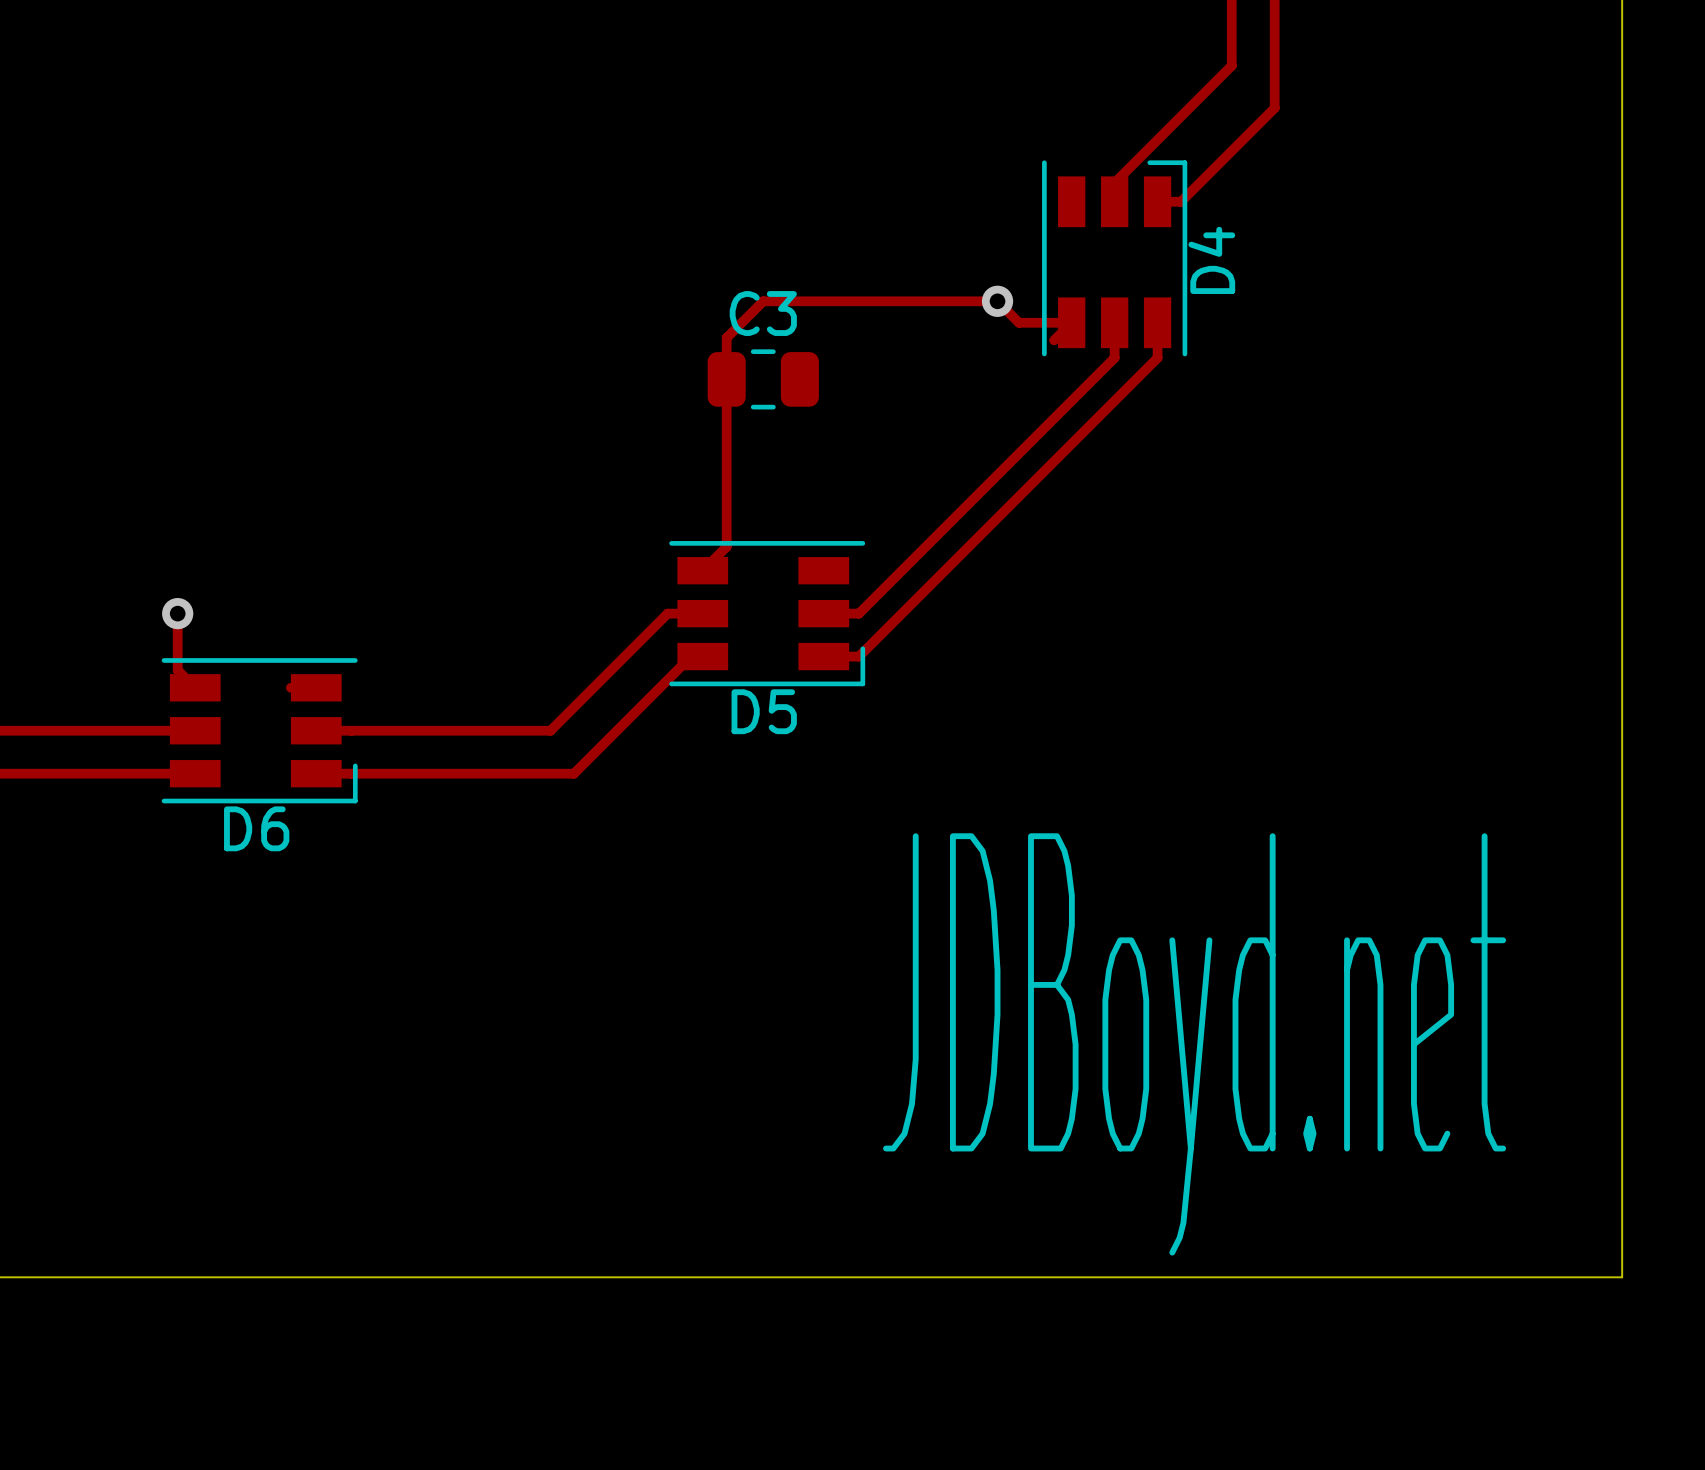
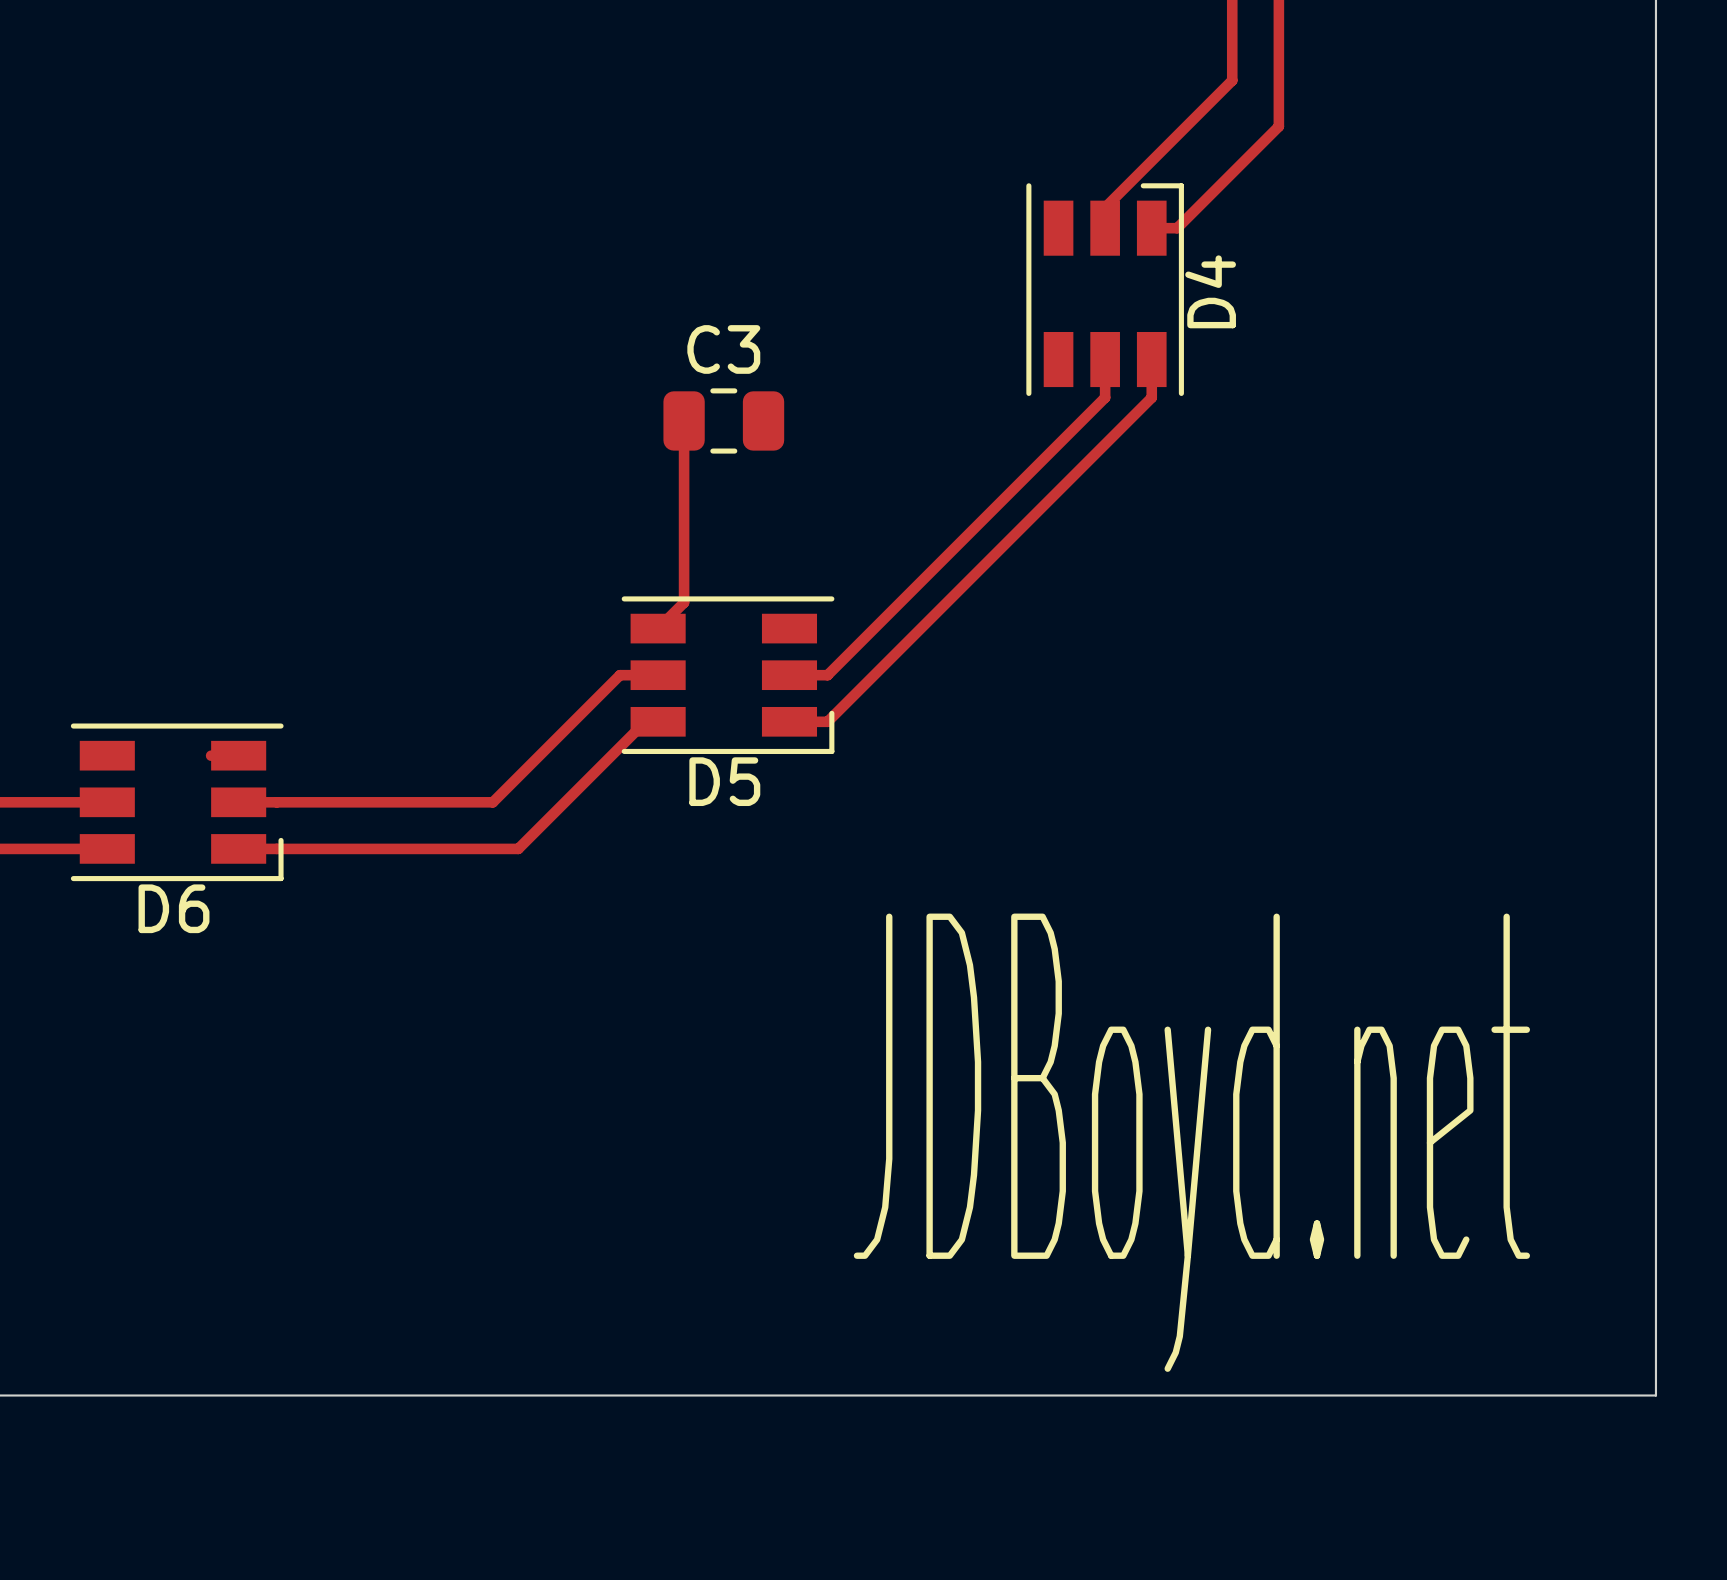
via: (997, 301) -> none
track: (1054, 340) (1071, 322) (1018, 322) (997, 301) (763, 301) (726, 337) (726, 379) -> none
track: (177, 613) (177, 670) (195, 687) -> none
via: (177, 613) -> none

